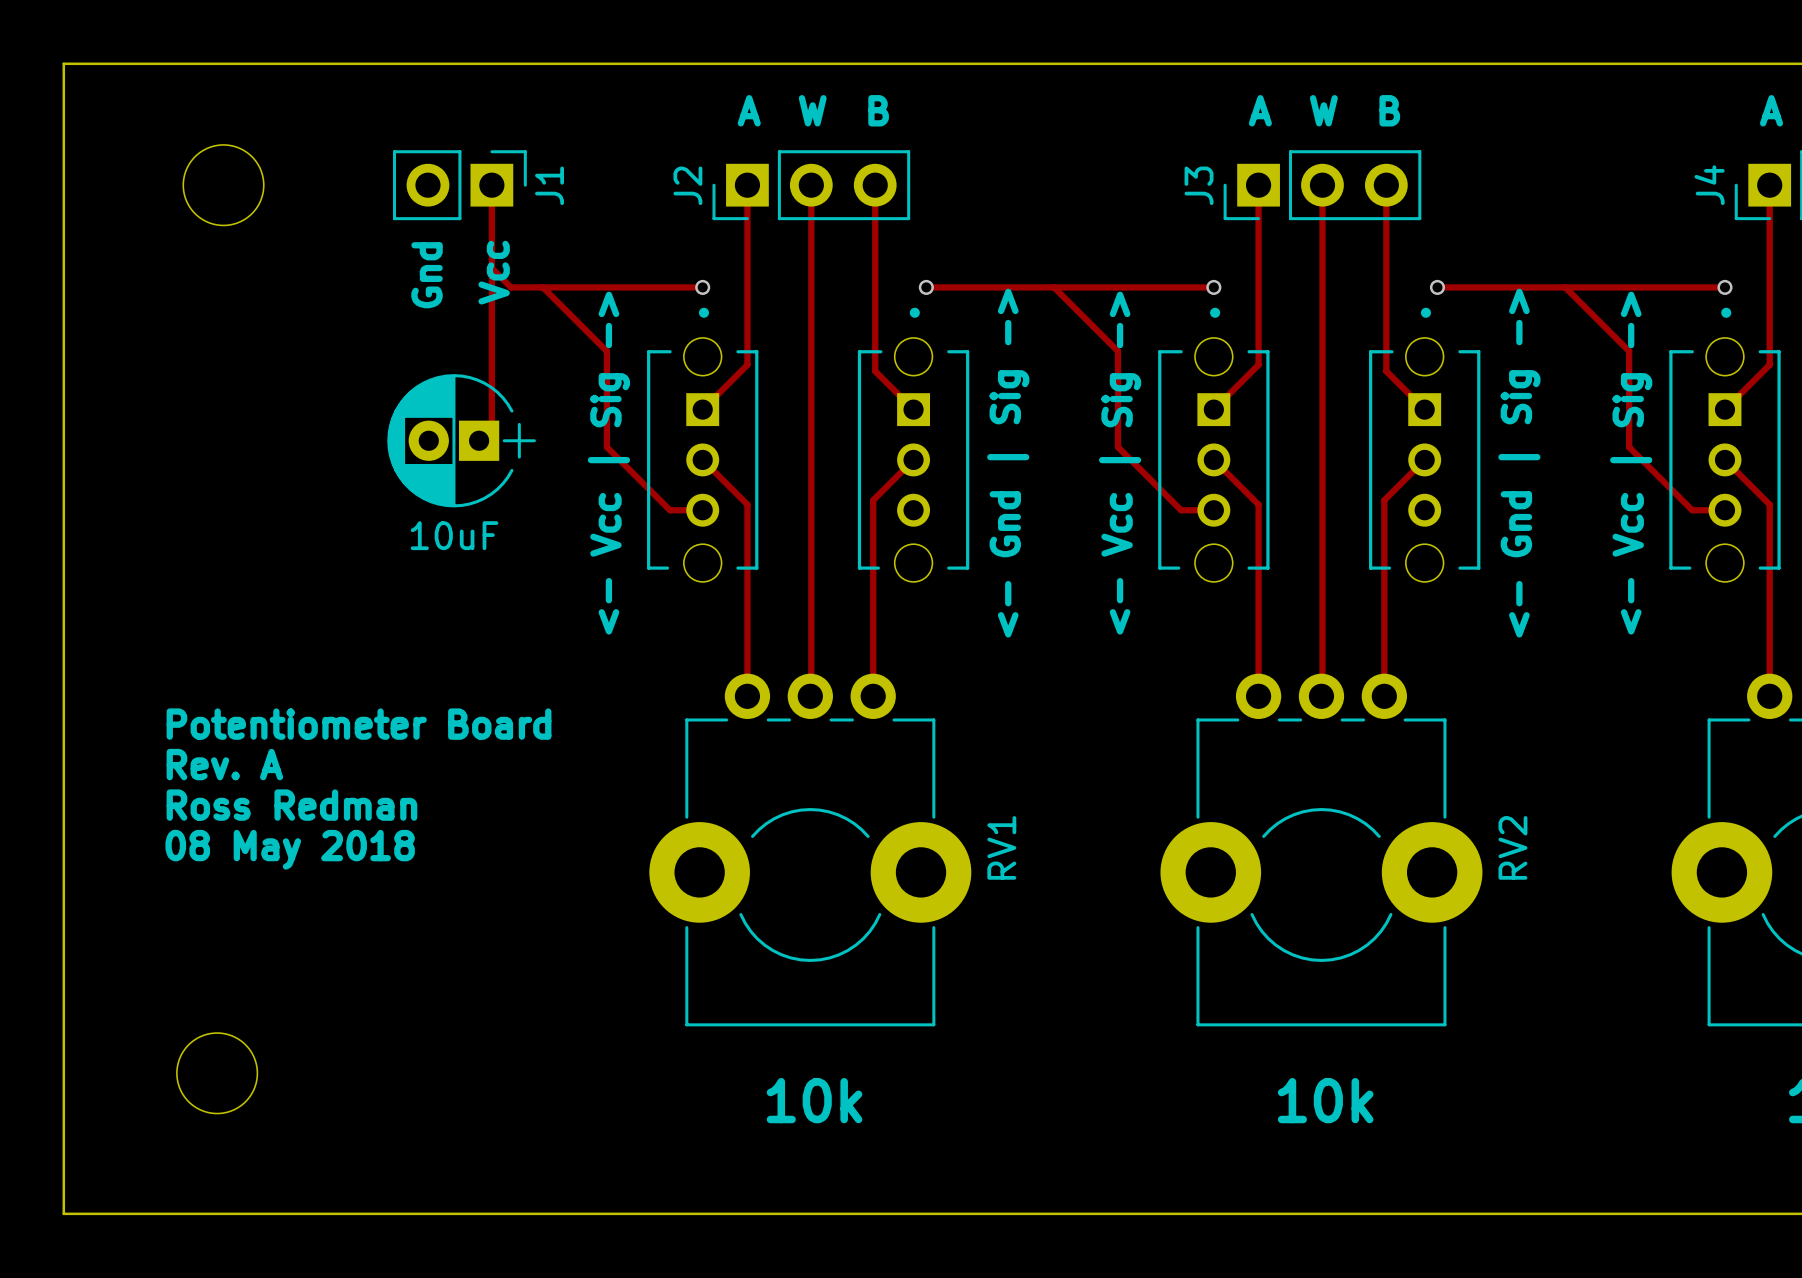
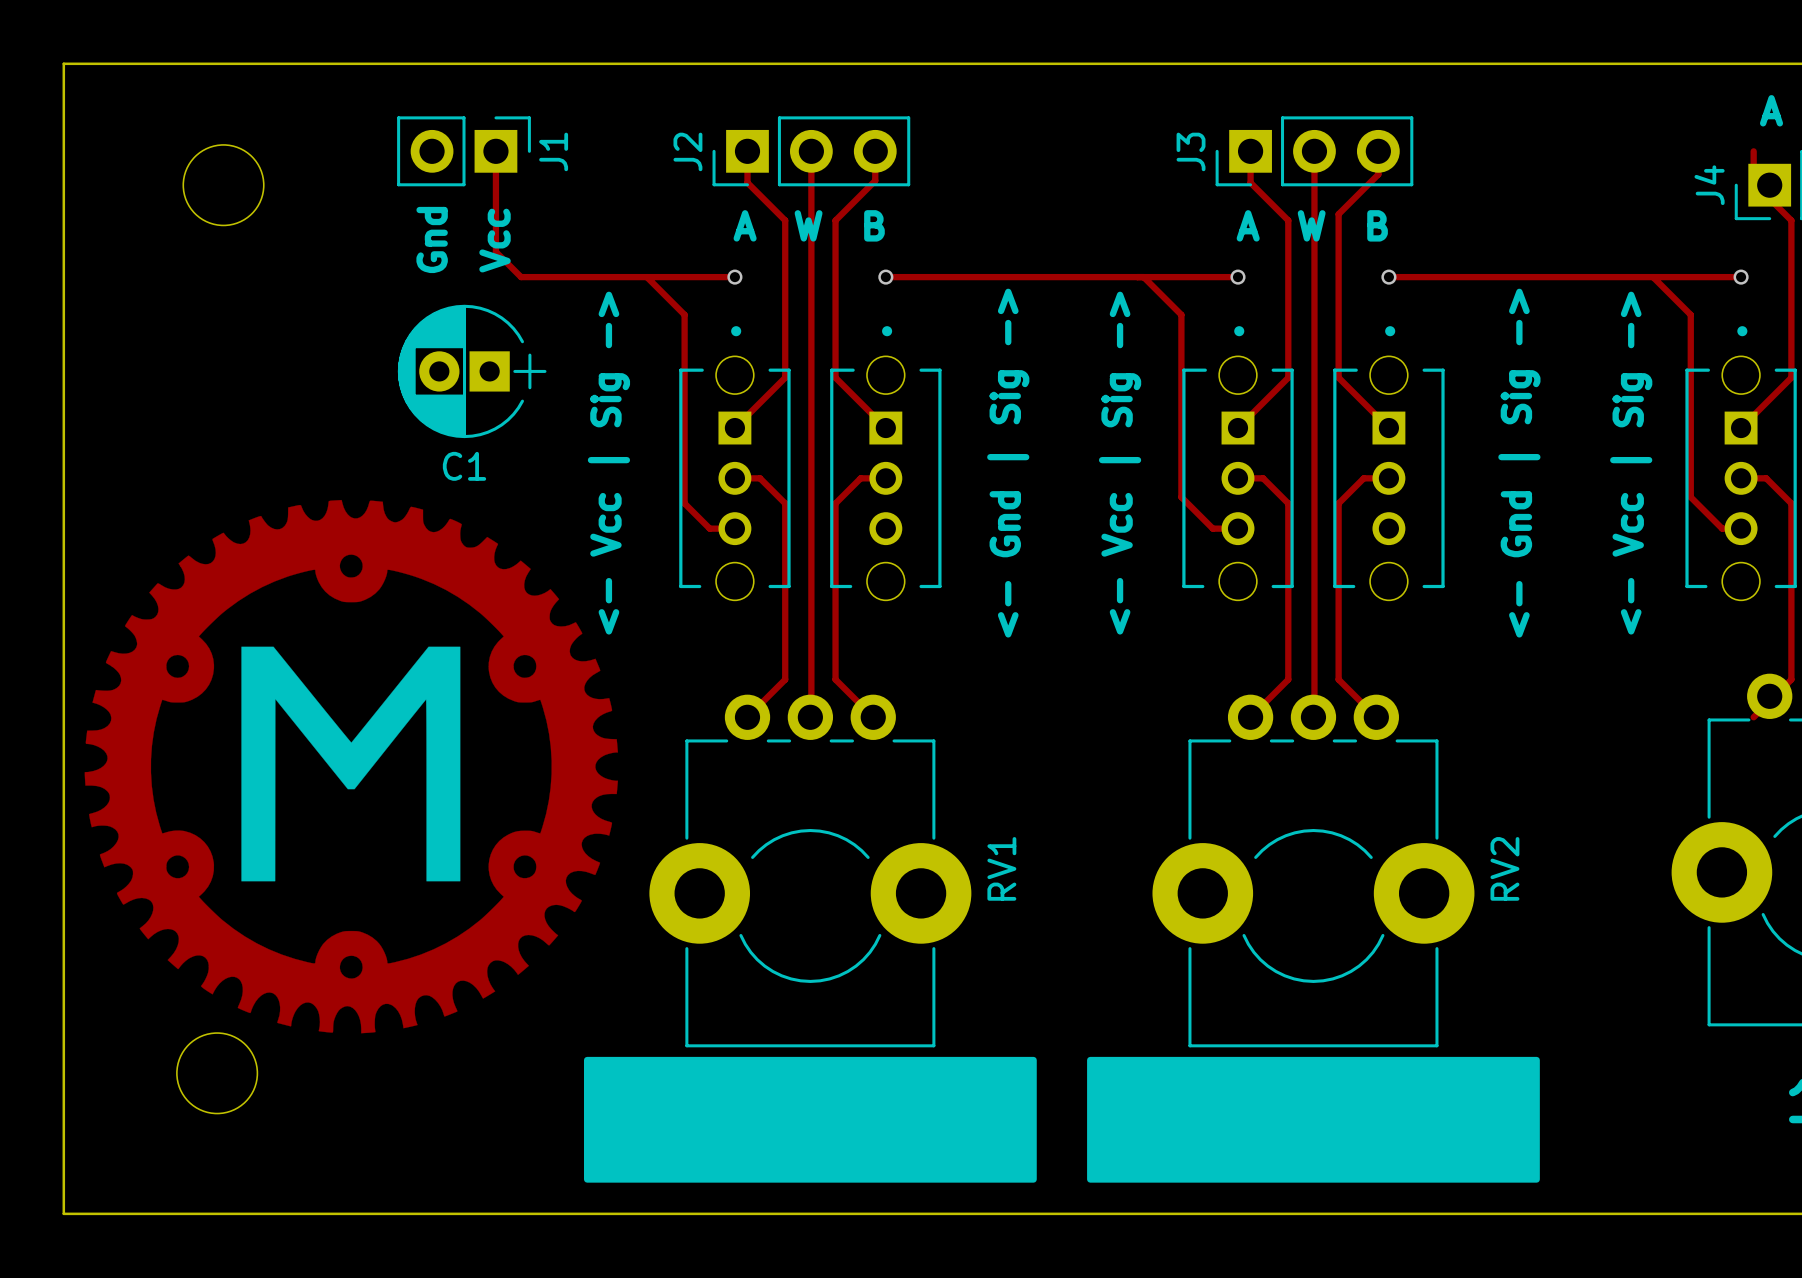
text position: A W B (813, 110) -> A W B (809, 225)
text position: A W B (1324, 110) -> A W B (1312, 225)
track: none -> (495, 151) (495, 251) (521, 277) (734, 277)
track: none -> (747, 151) (747, 182) (785, 220) (785, 377) (734, 428)
track: none -> (875, 151) (875, 180) (835, 220) (835, 377) (885, 428)
track: none -> (1250, 151) (1250, 182) (1288, 220) (1288, 377) (1238, 428)
track: none -> (1314, 151) (1313, 717)
track: none -> (1378, 151) (1378, 174) (1338, 214) (1338, 377) (1388, 428)
track: none -> (1753, 151) (1753, 182) (1791, 220) (1791, 377) (1741, 428)
J1 position: (459, 185) -> (464, 151)
track: (491, 185) (491, 427) (479, 440) -> none
track: (747, 185) (747, 364) (702, 409) -> none
J2 position: (811, 185) -> (811, 151)
track: (875, 185) (875, 371) (913, 409) -> none
track: (1258, 185) (1258, 364) (1213, 409) -> none
track: (1322, 185) (1321, 696) -> none
J3 position: (1322, 185) -> (1314, 151)
track: (1386, 185) (1386, 371) (1424, 409) -> none
track: (1769, 185) (1769, 364) (1724, 409) -> none
track: (491, 268) (511, 287) (702, 287) -> none
text position: Vcc (494, 272) -> Vcc (495, 240)
text position: Gnd (427, 275) -> Gnd (432, 239)
track: none -> (646, 277) (684, 314) (684, 503) (709, 528) (734, 528)
track: none -> (885, 277) (1238, 277)
track: none -> (1143, 277) (1181, 314) (1181, 497) (1212, 528) (1238, 528)
track: none -> (1388, 277) (1741, 277)
track: none -> (1653, 277) (1690, 314) (1690, 497) (1722, 528) (1741, 528)
track: (542, 287) (606, 351) (606, 447) (669, 510) (702, 510) -> none
via position: (702, 287) -> (734, 277)
track: (926, 287) (1213, 287) -> none
via position: (926, 287) -> (885, 277)
track: (1054, 287) (1118, 351) (1118, 447) (1181, 510) (1213, 510) -> none
via position: (1213, 287) -> (1238, 277)
track: (1437, 287) (1724, 287) -> none
via position: (1437, 287) -> (1388, 277)
track: (1565, 287) (1629, 351) (1629, 447) (1692, 510) (1724, 510) -> none
via position: (1724, 287) -> (1741, 277)
C1: none -> (472, 371)
10uF: (461, 440) -> none
part position: (702, 444) -> (734, 463)
part position: (913, 444) -> (885, 463)
part position: (1213, 444) -> (1238, 463)
part position: (1424, 444) -> (1388, 463)
part position: (1724, 444) -> (1741, 463)
track: (702, 459) (747, 504) (747, 696) -> none
track: (913, 459) (873, 500) (873, 696) -> none
track: (1213, 459) (1258, 504) (1258, 696) -> none
track: (1424, 459) (1384, 500) (1384, 696) -> none
track: (1724, 459) (1769, 504) (1769, 696) -> none
track: none -> (734, 478) (760, 478) (785, 503) (785, 679) (747, 717)
track: none -> (885, 478) (860, 478) (835, 503) (835, 679) (873, 717)
track: none -> (1238, 478) (1263, 478) (1288, 503) (1288, 679) (1250, 717)
track: none -> (1388, 478) (1363, 478) (1338, 503) (1338, 679) (1376, 717)
track: none -> (1741, 478) (1766, 478) (1791, 503) (1791, 679) (1753, 717)
drawing: none -> [84, 499, 1037, 1183]
text: Potentiometer Board (359, 724) -> none
text: Rev. A (224, 764) -> none
text: Ross Redman (291, 805) -> none
text: 08 May 2018 (290, 849) -> none
RV1 position: (810, 850) -> (810, 871)
RV2 position: (1321, 850) -> (1313, 871)
drawing: none -> [1087, 1056, 1540, 1183]
text: 10k (814, 1100) -> none
text: 10k (1325, 1100) -> none

